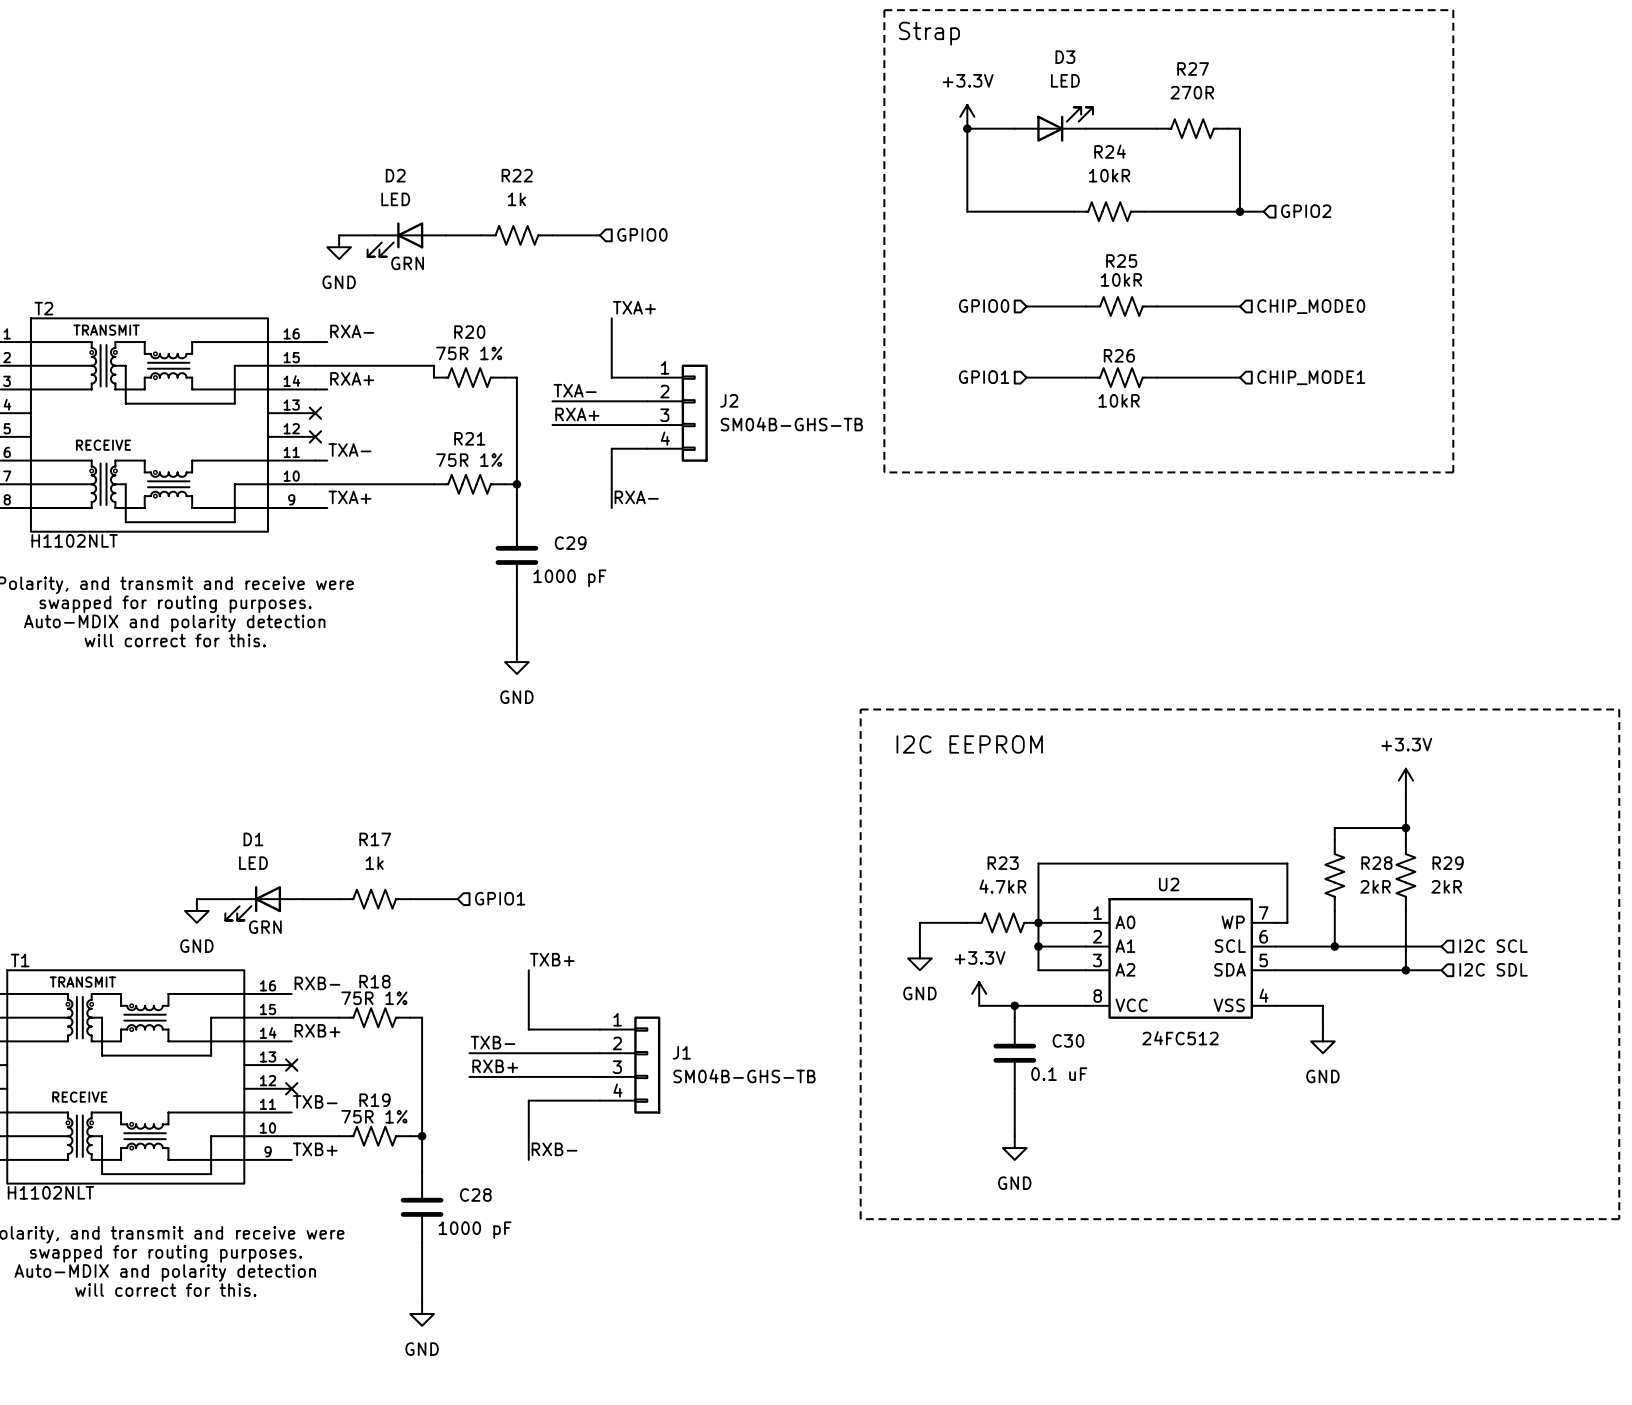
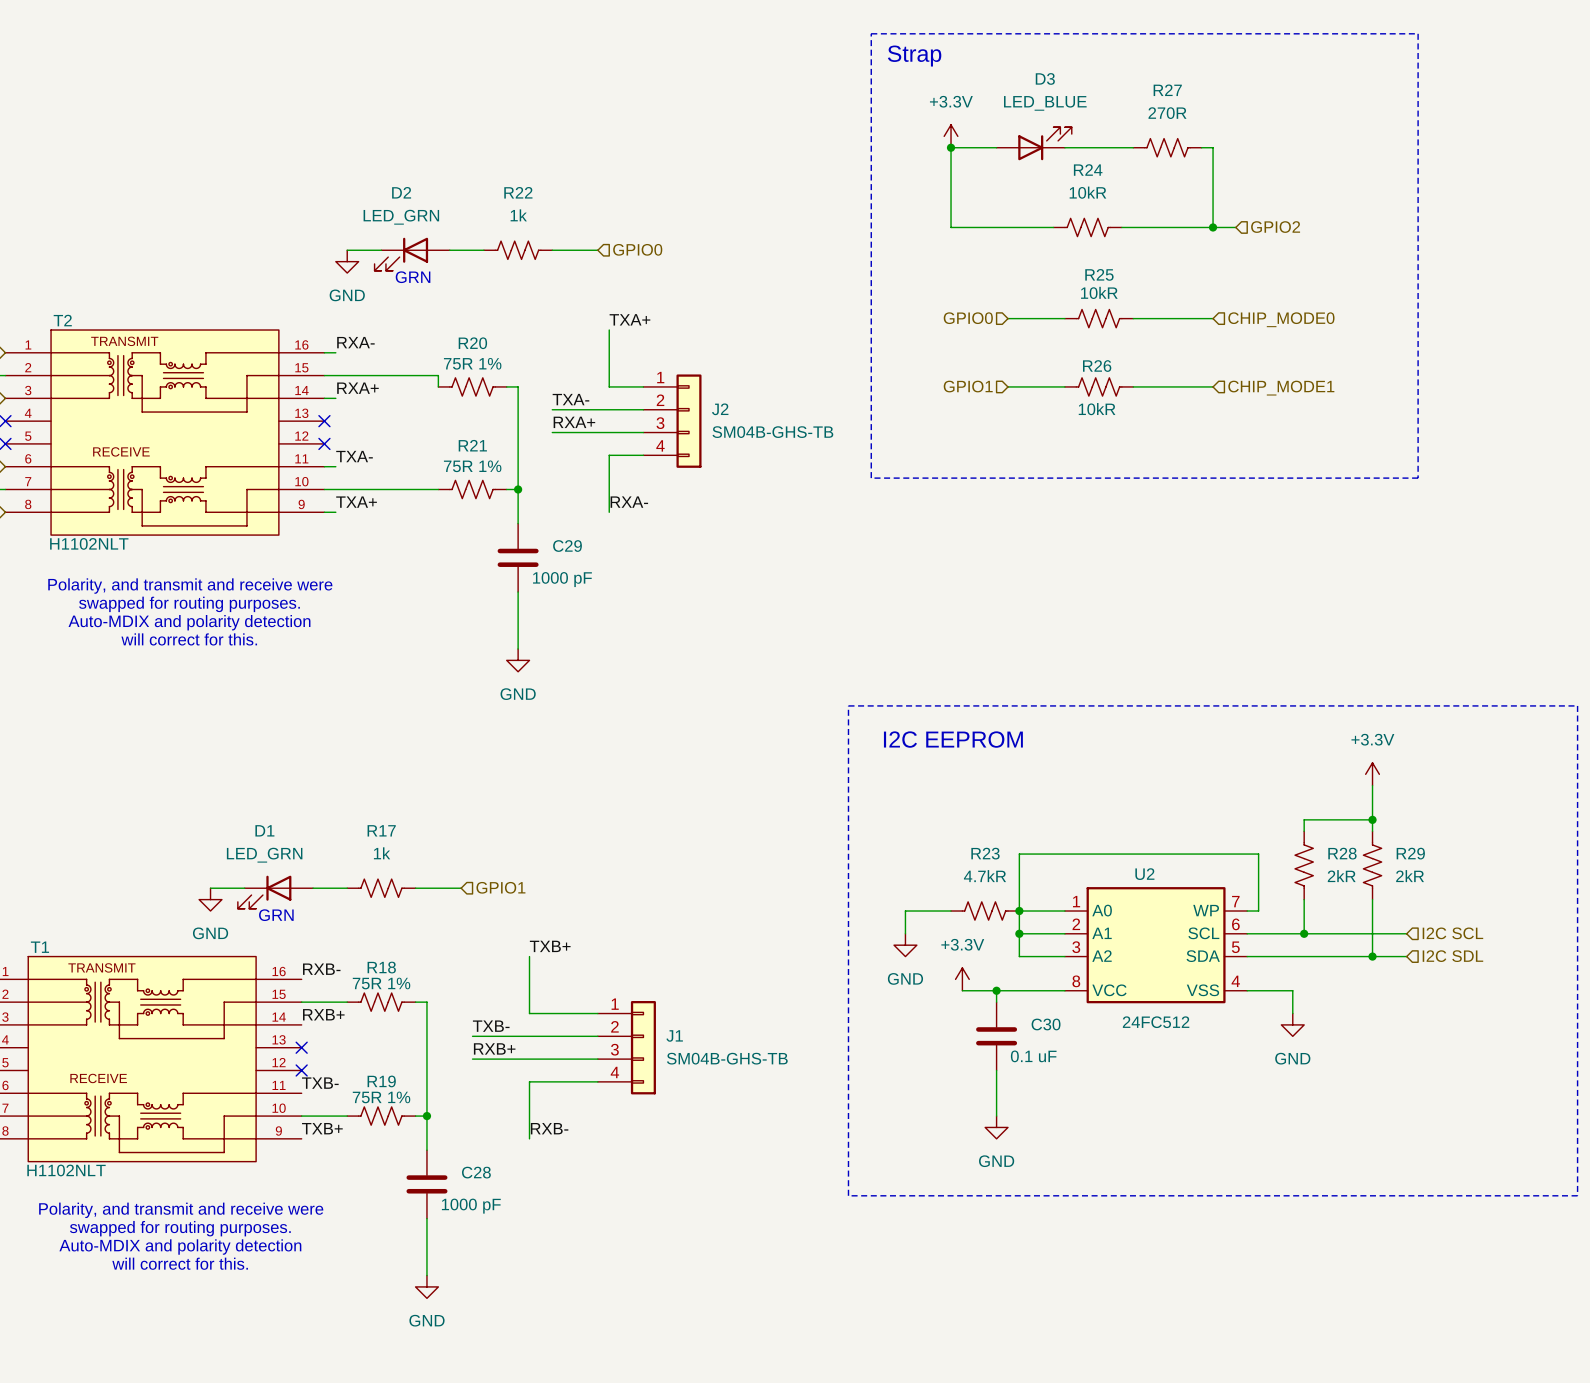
D3 value: LED (1065, 80) -> LED_BLUE (1045, 103)
D2 value: LED (395, 199) -> LED_GRN (401, 217)
D1 value: LED (253, 863) -> LED_GRN (264, 855)

